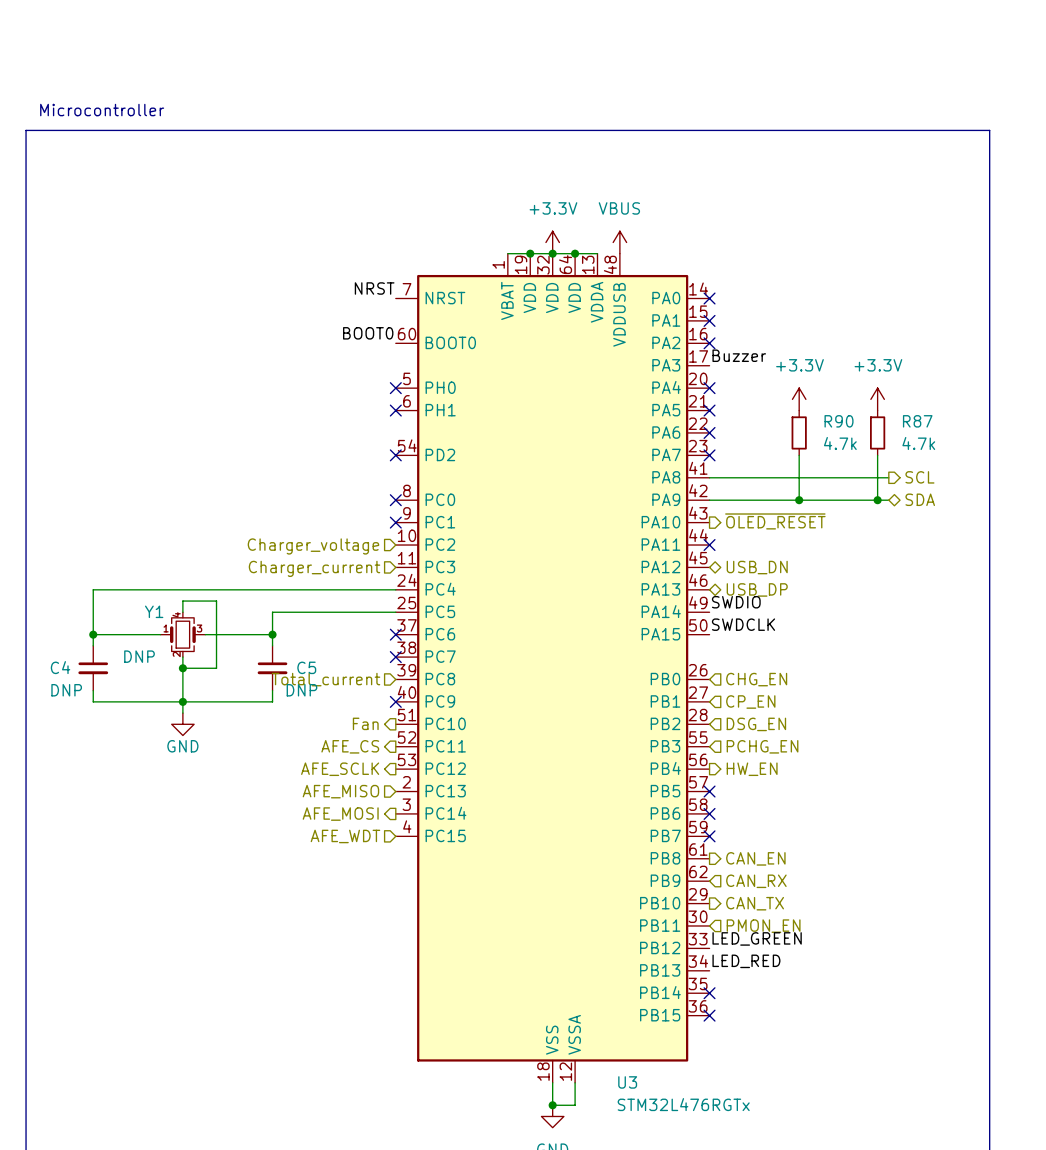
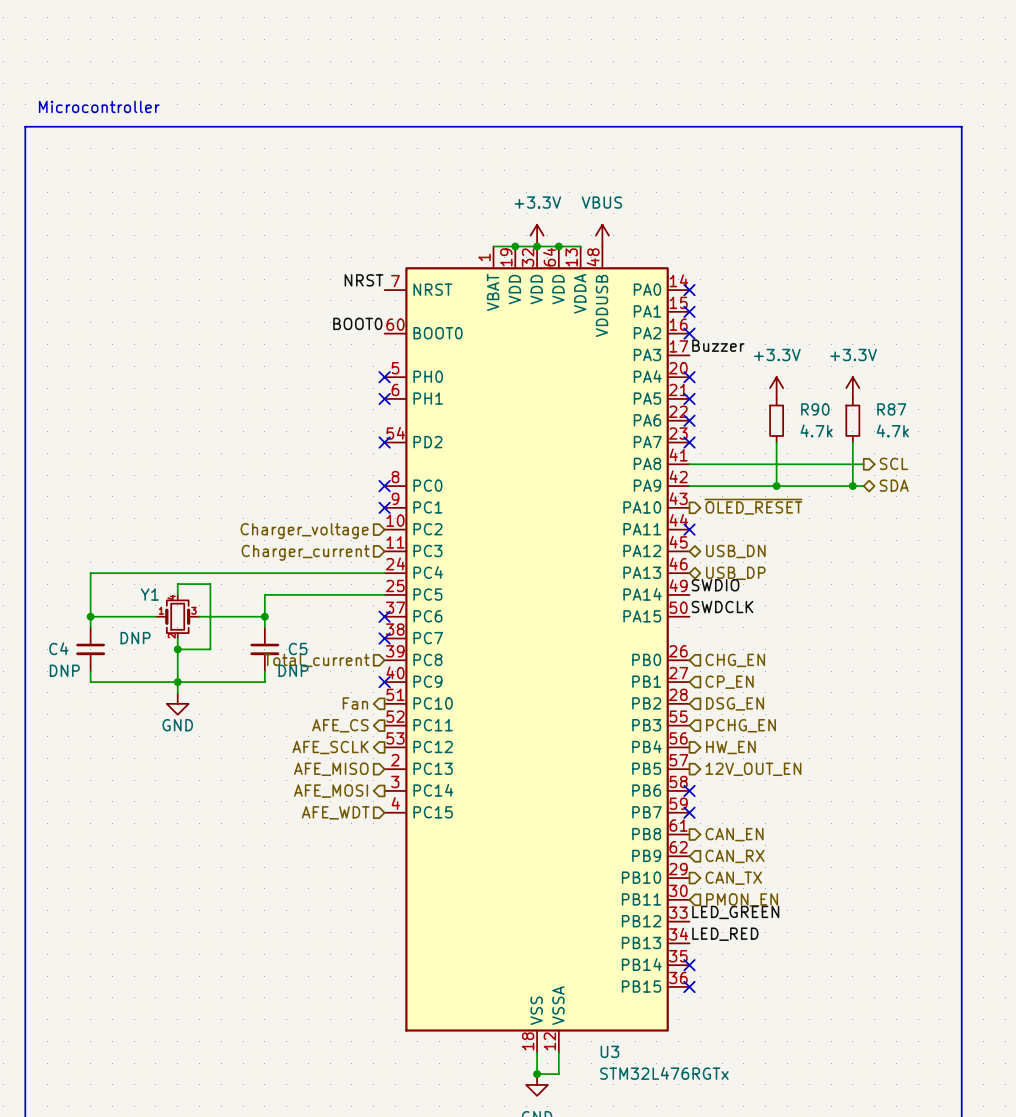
no-connect mark: (709, 791) -> none
hierarchical label: none -> 12V_OUT_EN (753, 769)

